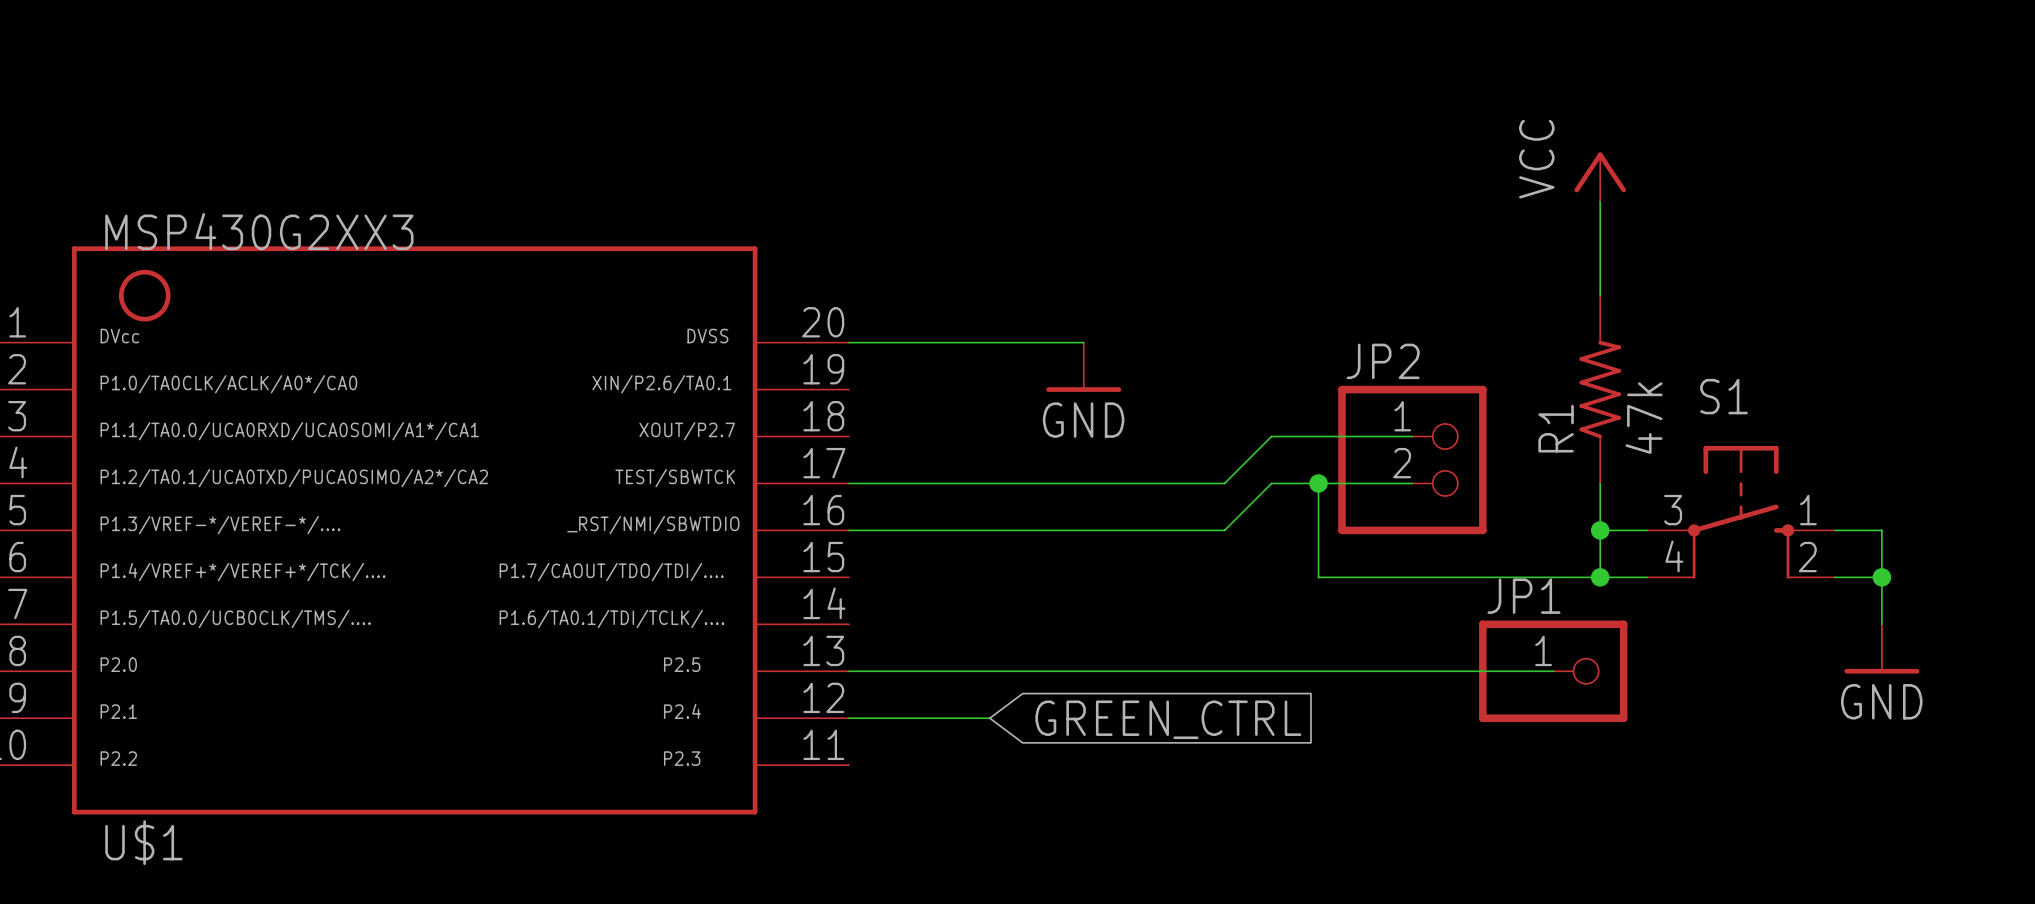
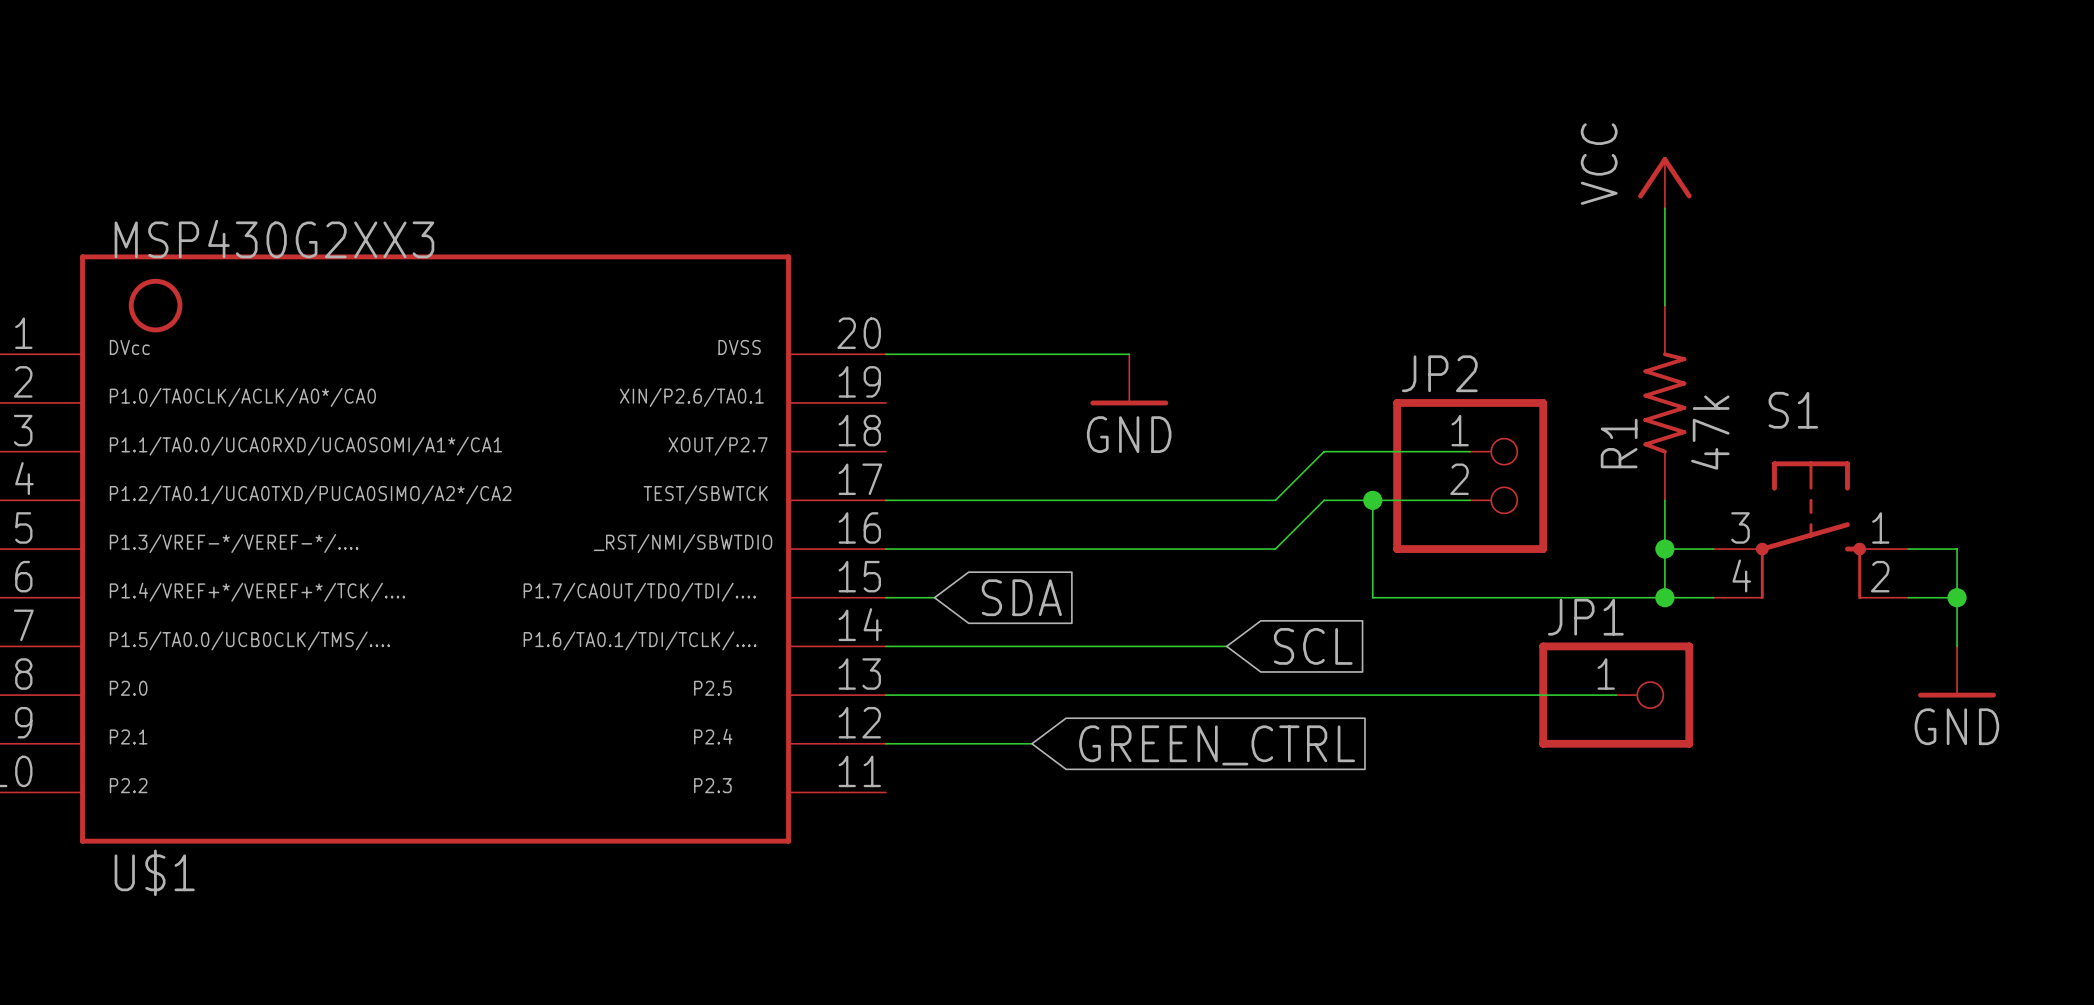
wire: none -> (885, 597) (934, 597)
global label: none -> SDA (1021, 597)
wire: none -> (885, 646) (1226, 646)
global label: none -> SCL (1313, 646)

